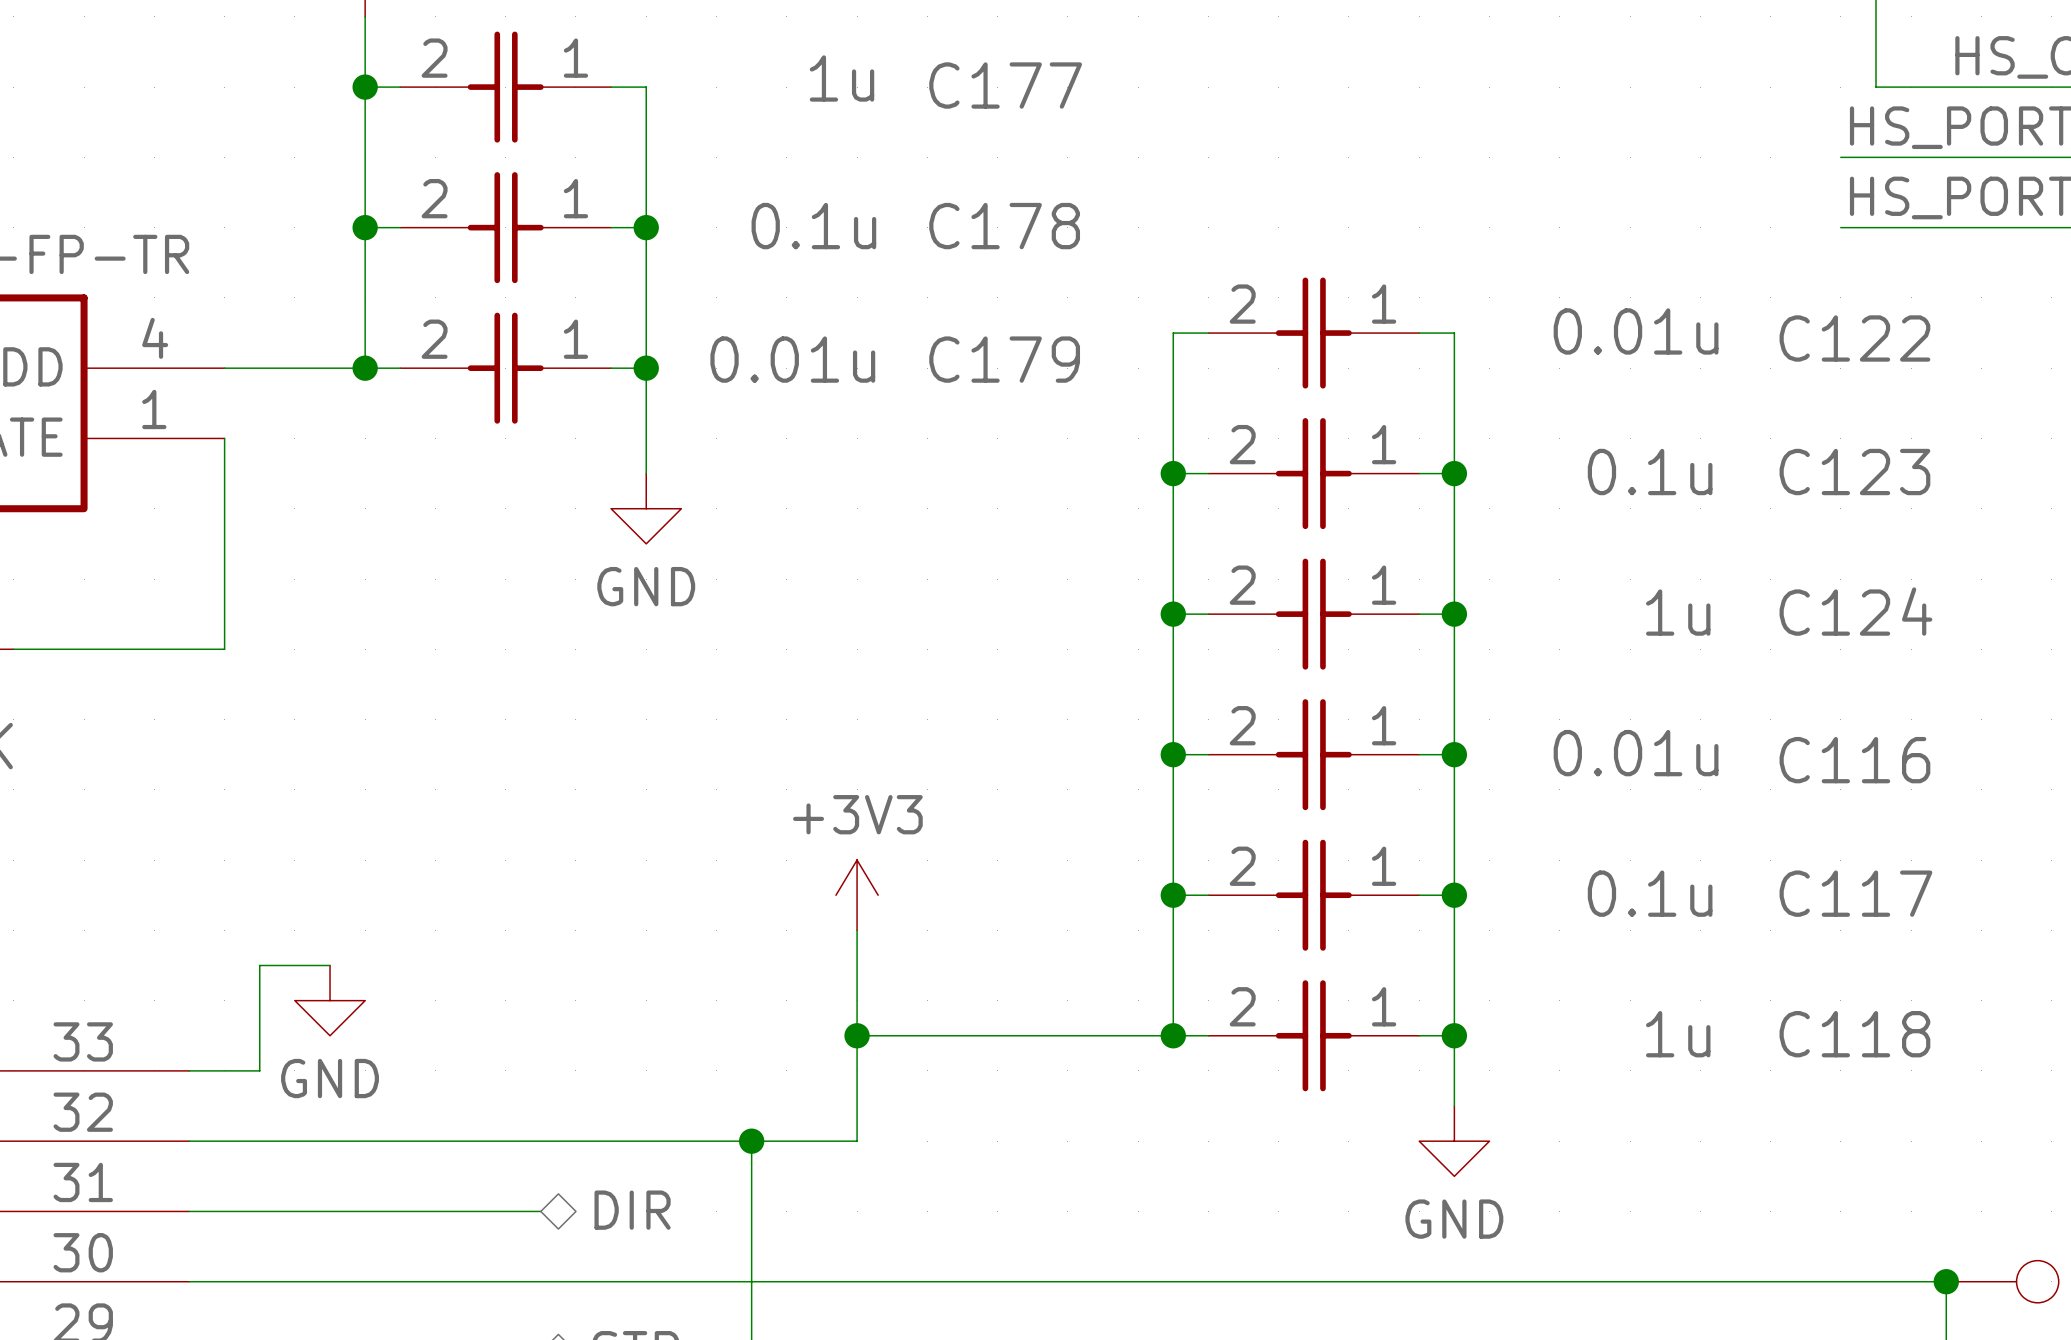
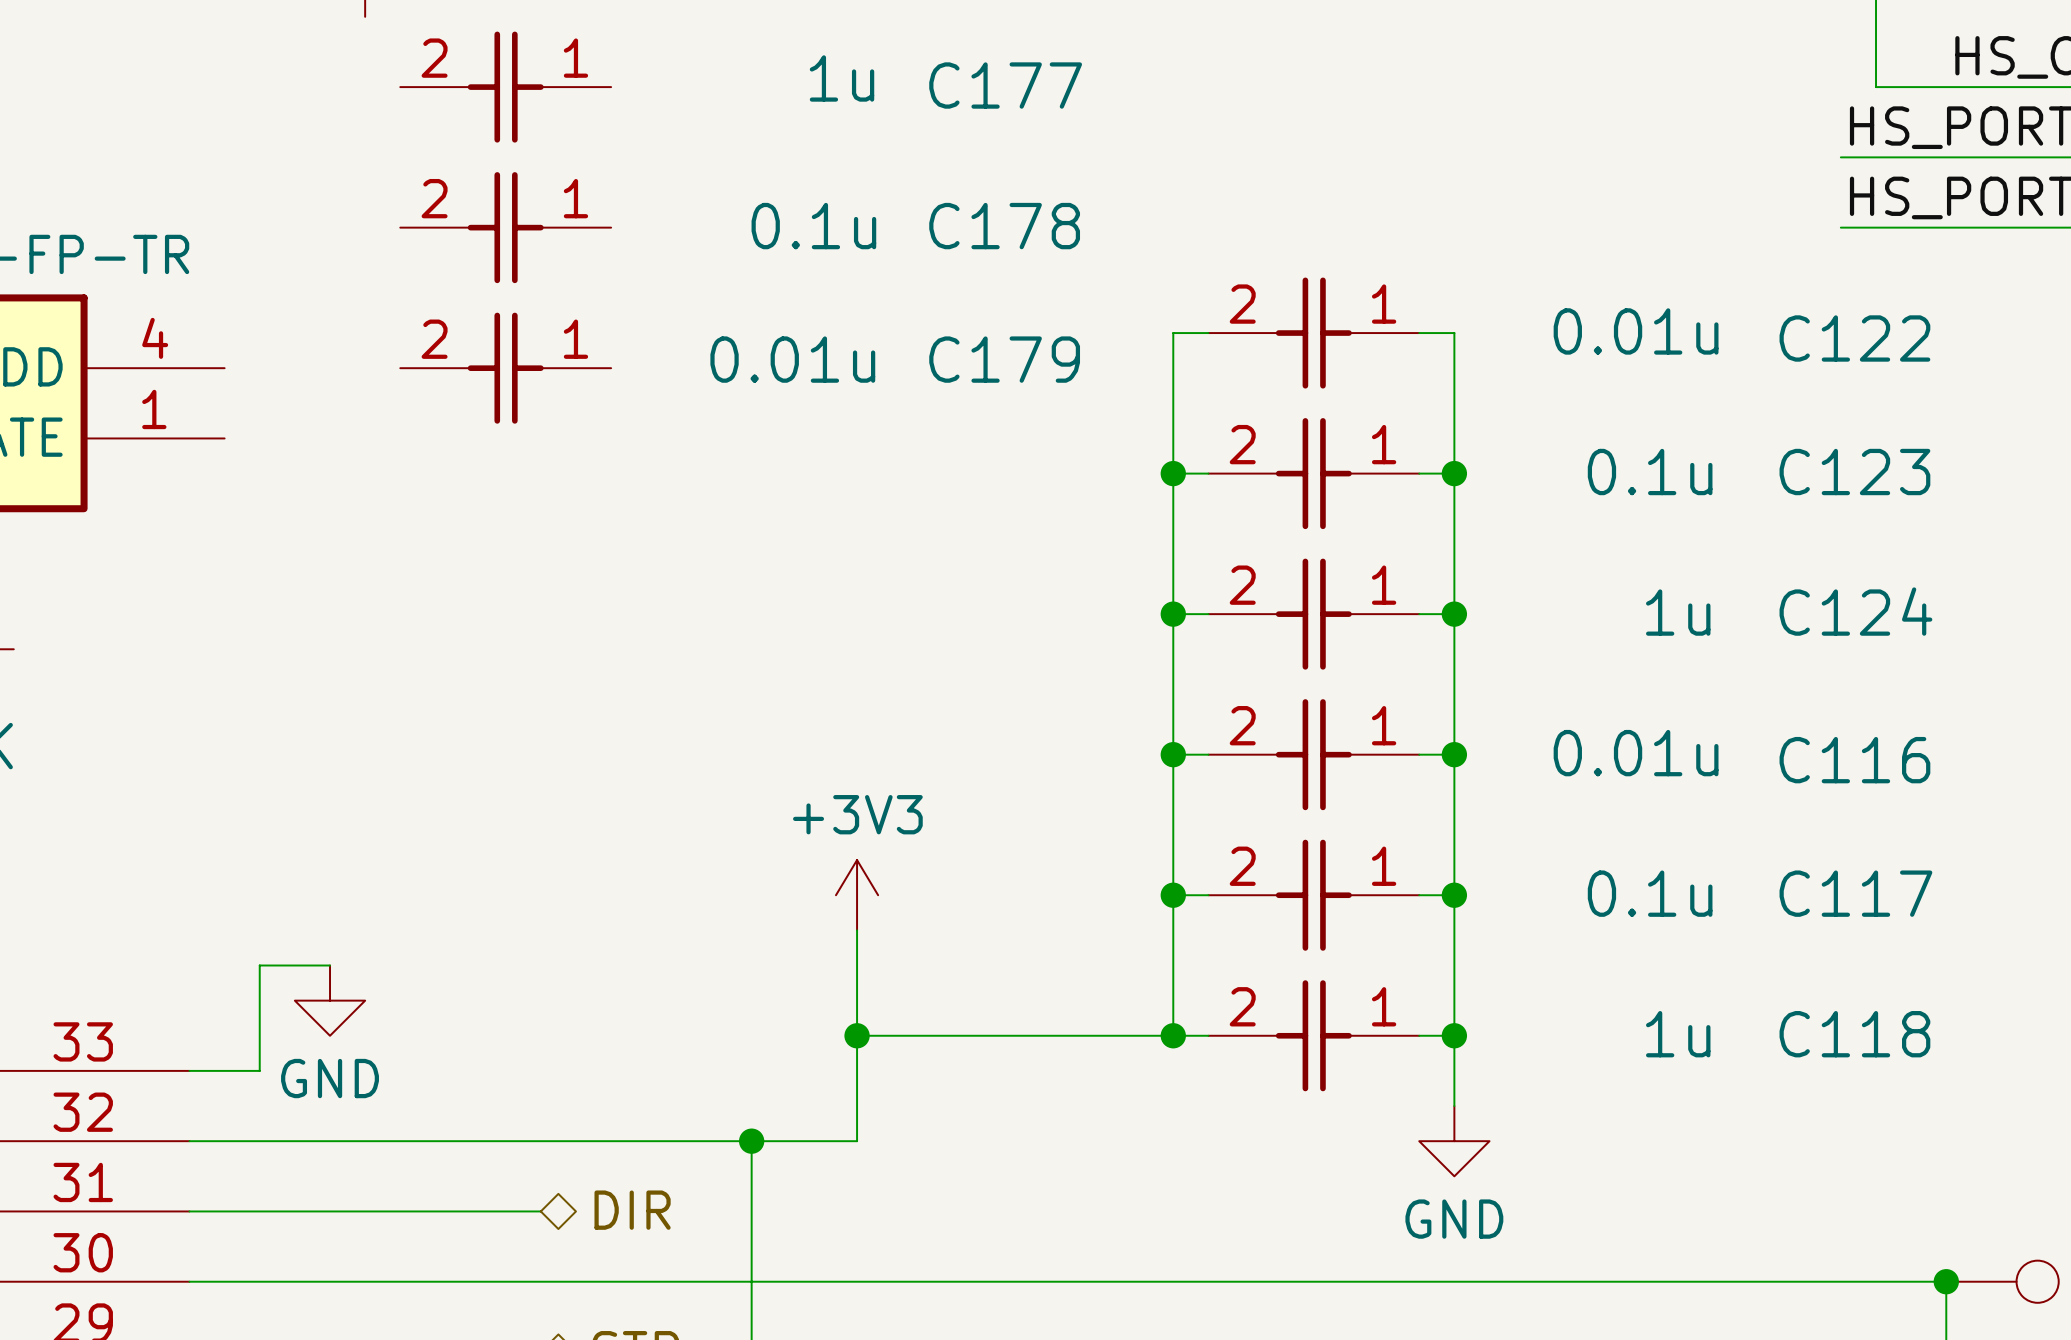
wire: (365, 16) (365, 368) -> none
wire: (365, 87) (400, 87) -> none
junction: (365, 87) -> none
wire: (611, 87) (646, 87) (646, 473) -> none
wire: (365, 227) (400, 227) -> none
junction: (365, 227) -> none
wire: (611, 227) (646, 227) -> none
junction: (646, 227) -> none
wire: (224, 368) (400, 368) -> none
junction: (365, 368) -> none
wire: (611, 368) (646, 368) -> none
junction: (646, 368) -> none
wire: (224, 438) (224, 649) (13, 649) -> none
power symbol: GND (646, 508) -> none

